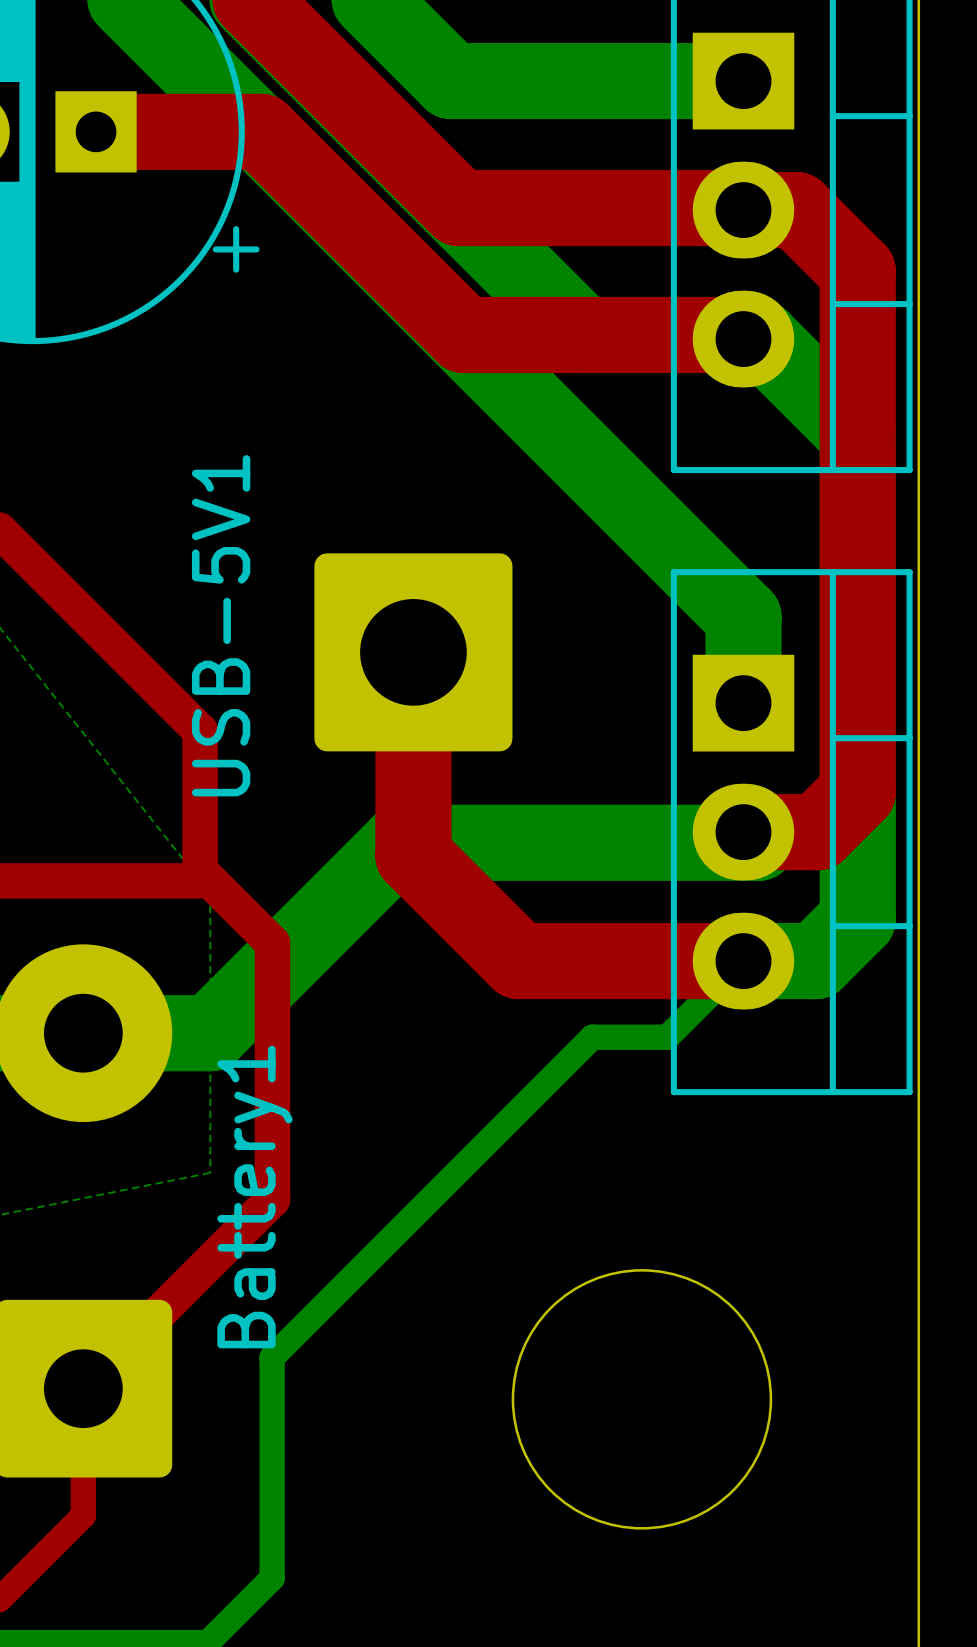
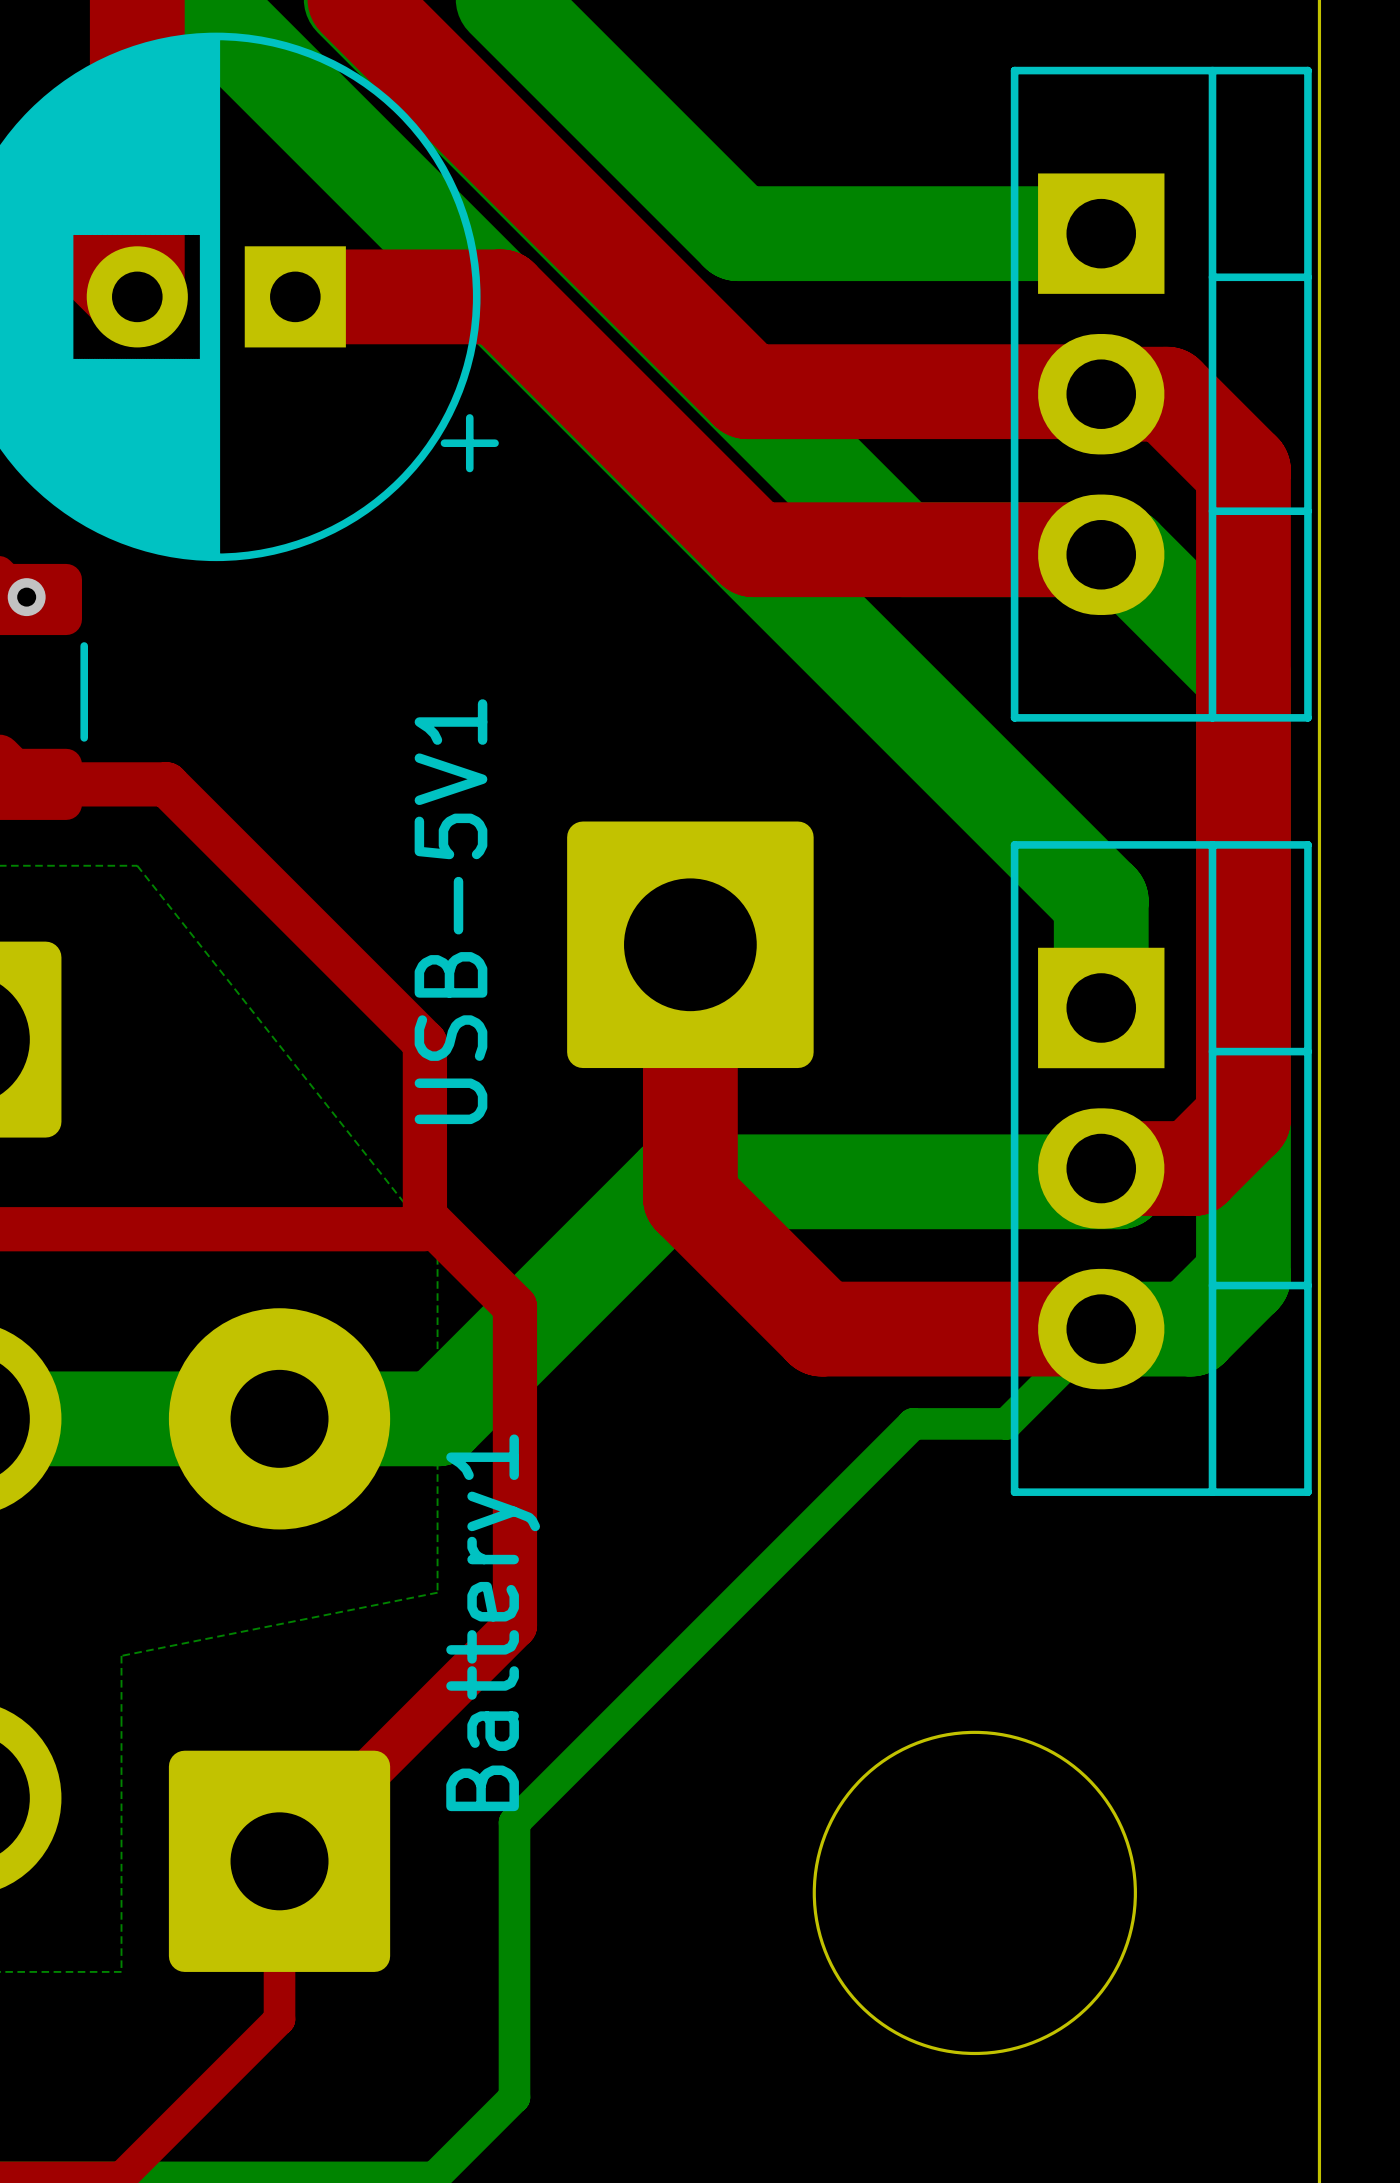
round board edge position: (641, 1399) -> (974, 1892)

